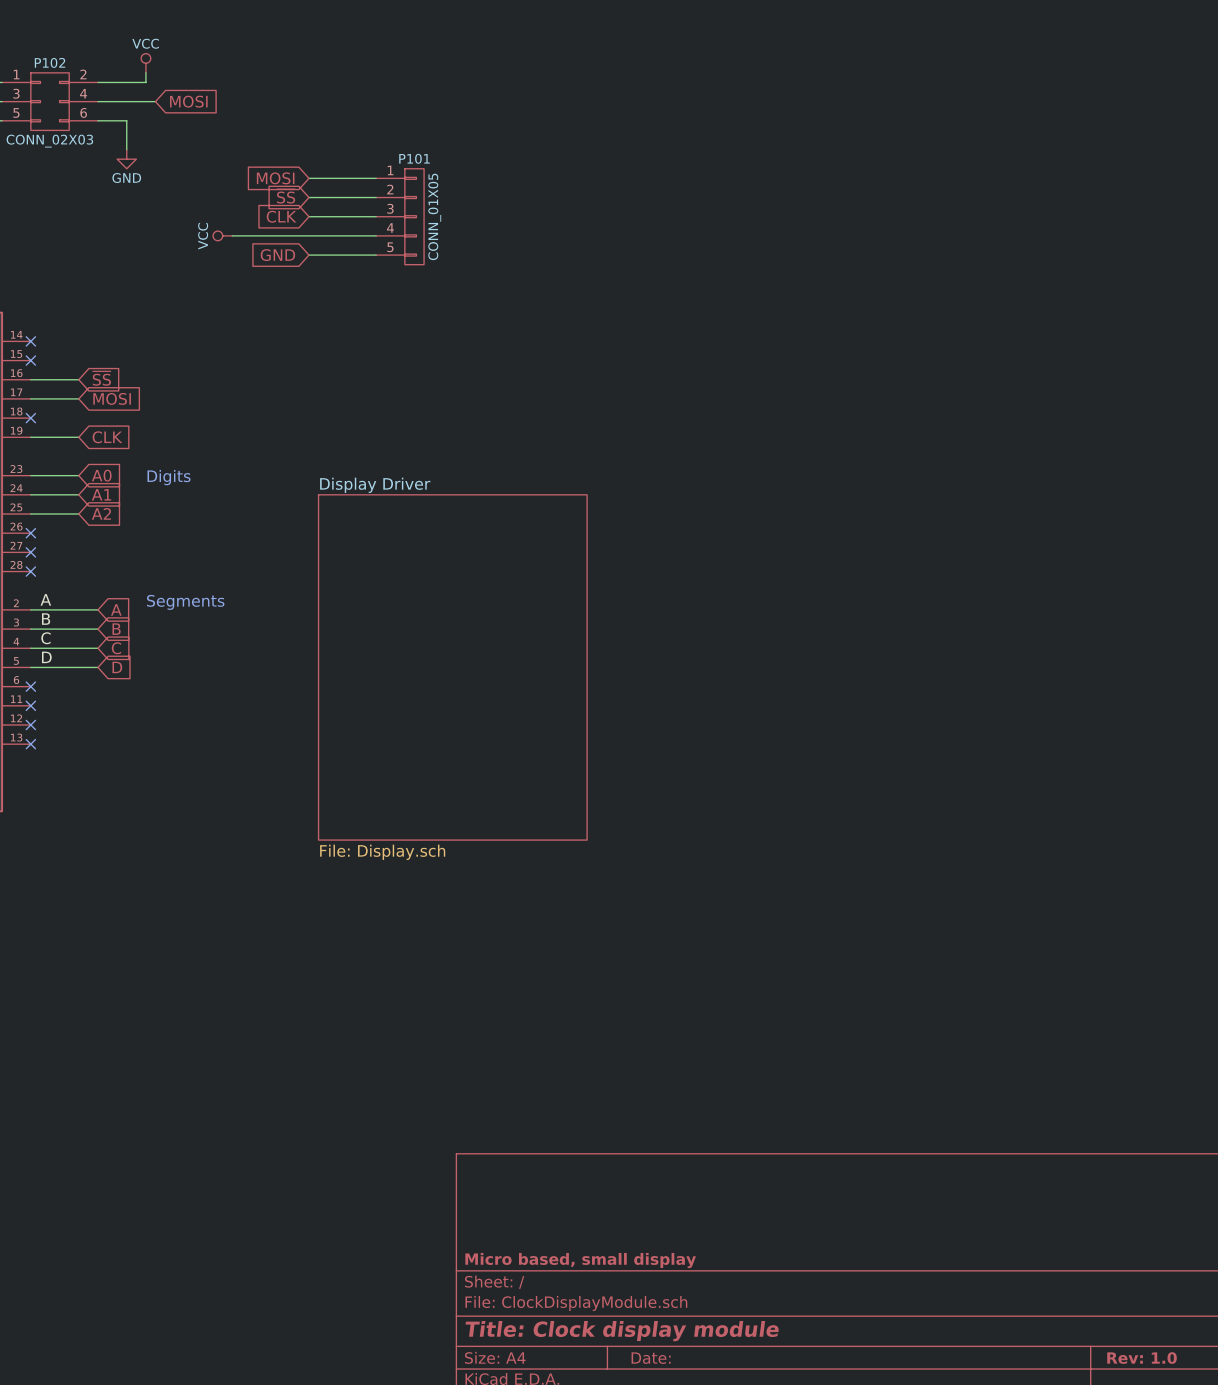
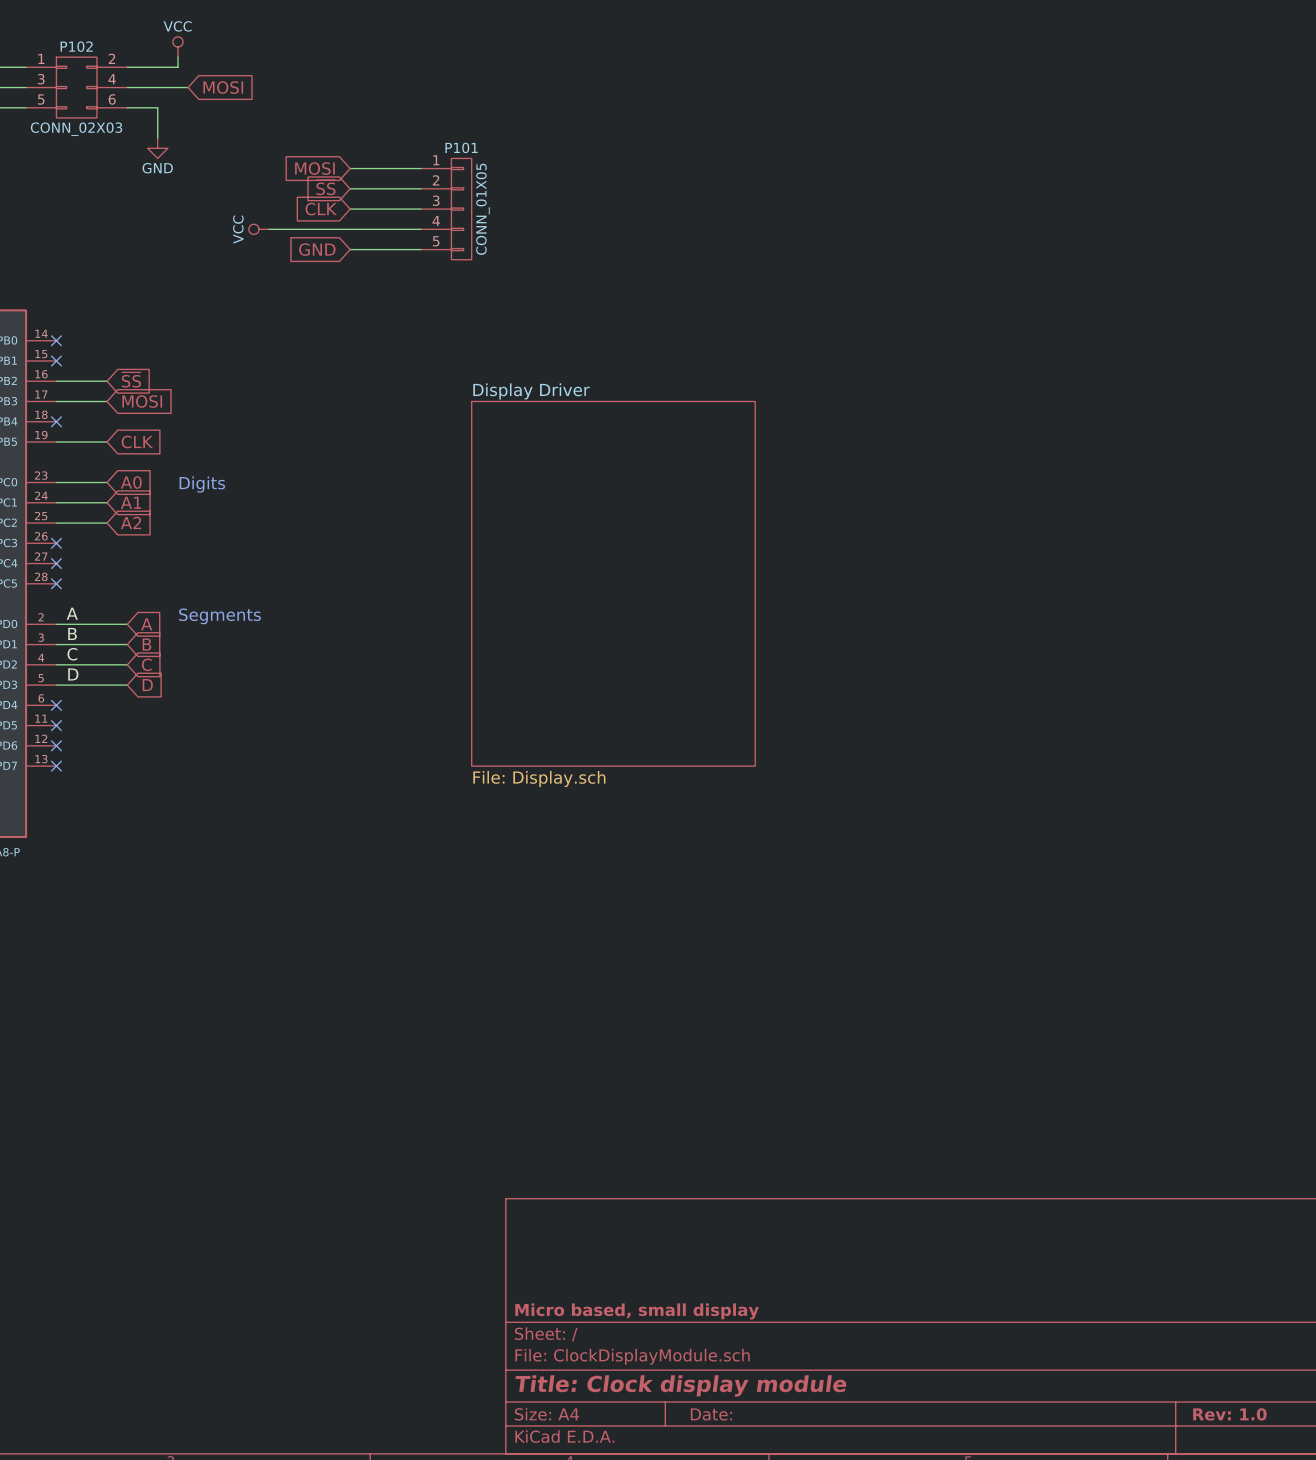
sheet Display Driver position: (452, 667) -> (613, 583)

